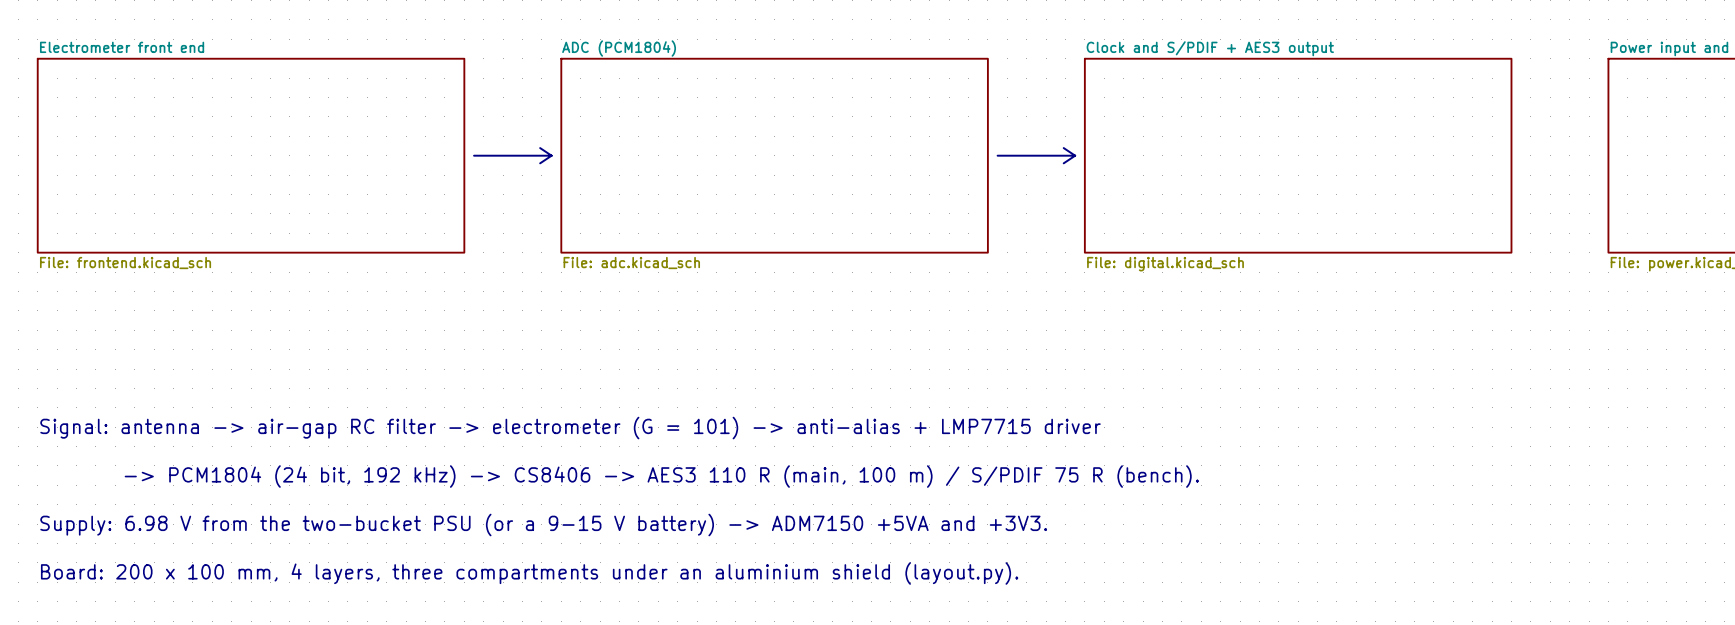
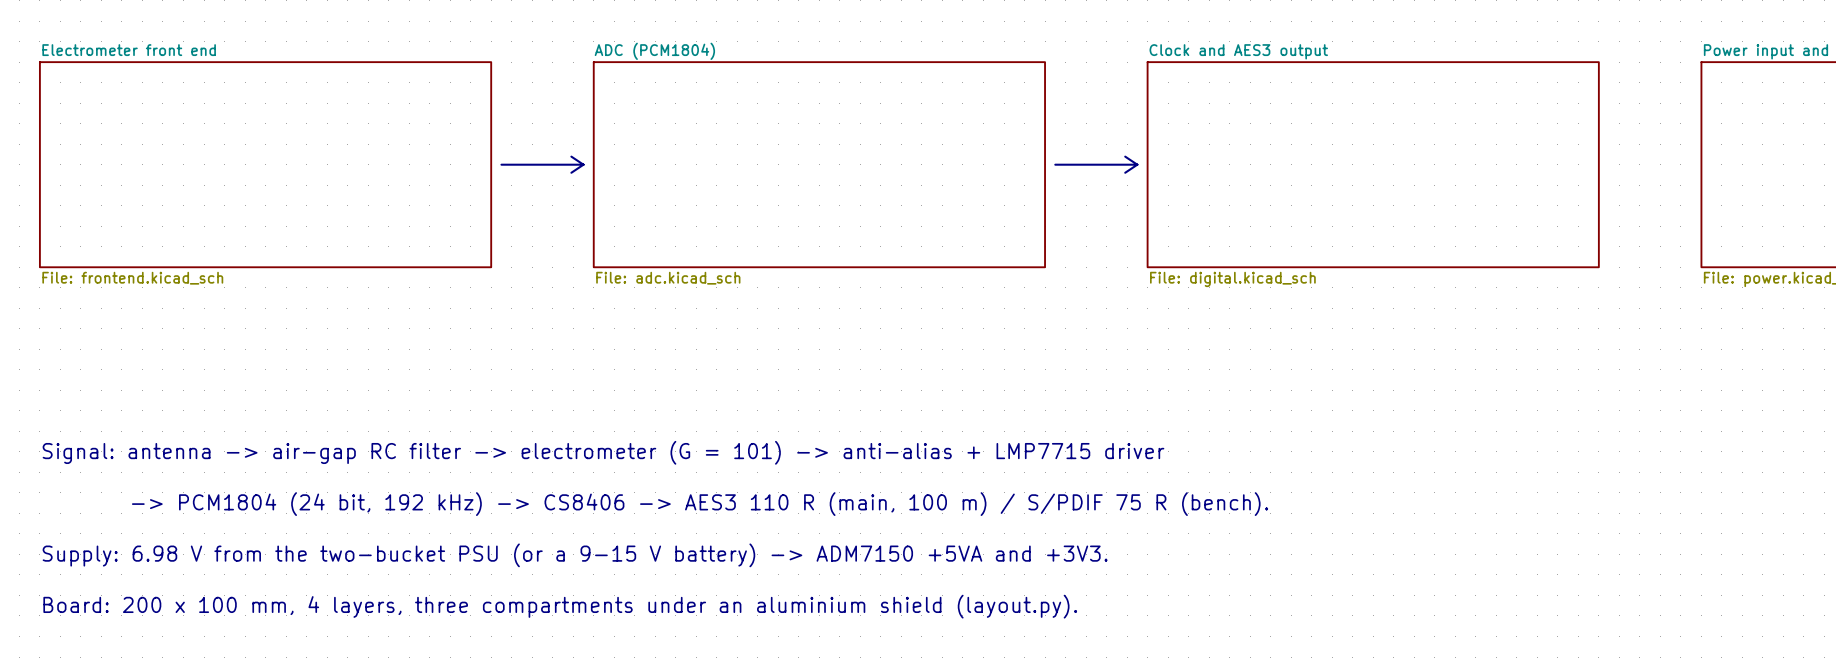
sheet Clock and S/PDIF + AES3 output name: Clock and S/PDIF + AES3 output (1210, 48) -> Clock and AES3 output (1238, 51)

